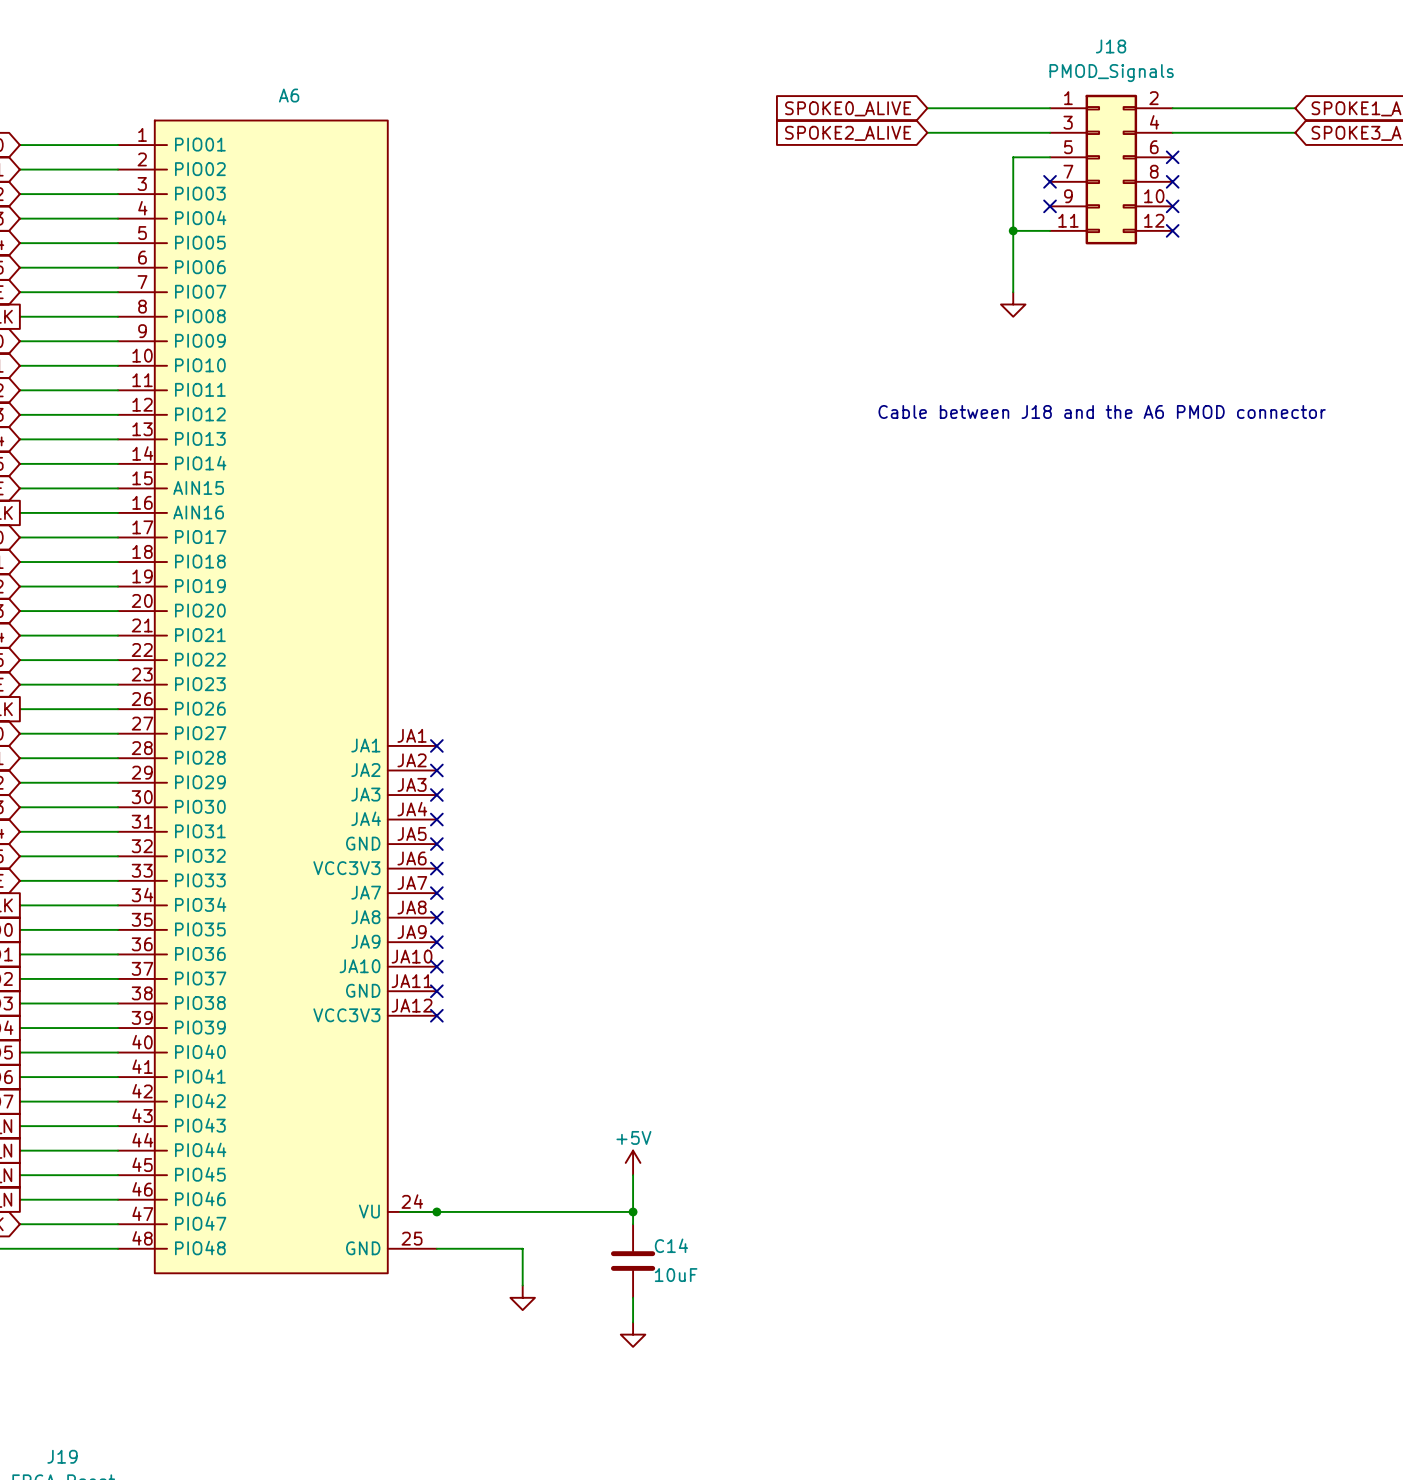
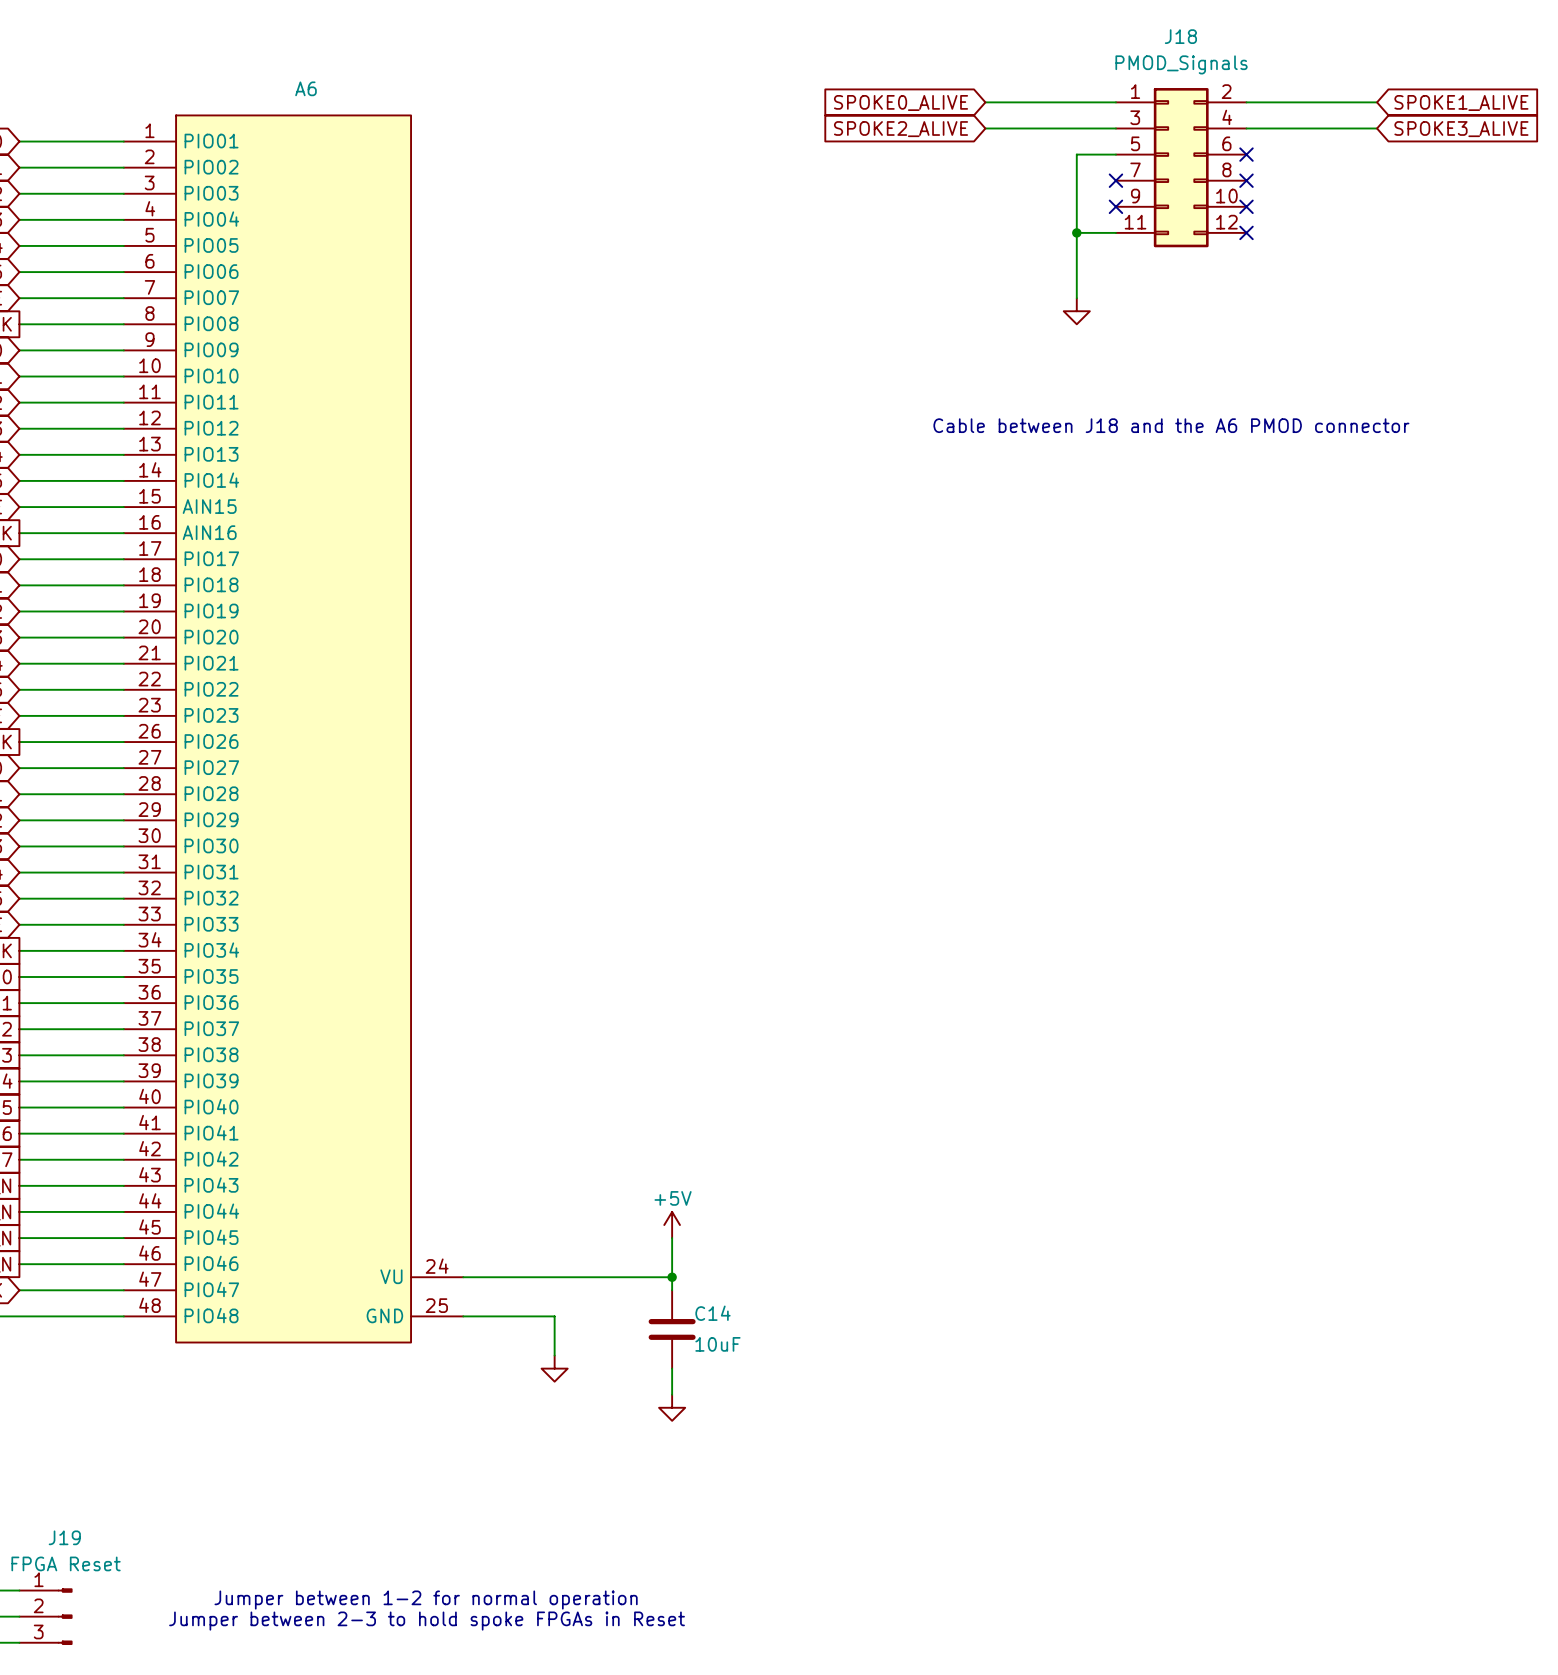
A6 symbol: [118, 120, 437, 1274] -> [123, 115, 464, 1343]
no-connect mark: (436, 745) -> none
no-connect mark: (436, 770) -> none
no-connect mark: (436, 795) -> none
no-connect mark: (436, 819) -> none
no-connect mark: (436, 844) -> none
no-connect mark: (436, 868) -> none
no-connect mark: (436, 893) -> none
no-connect mark: (436, 917) -> none
no-connect mark: (436, 942) -> none
no-connect mark: (436, 966) -> none
no-connect mark: (436, 991) -> none
no-connect mark: (436, 1015) -> none
junction: (436, 1211) -> none

